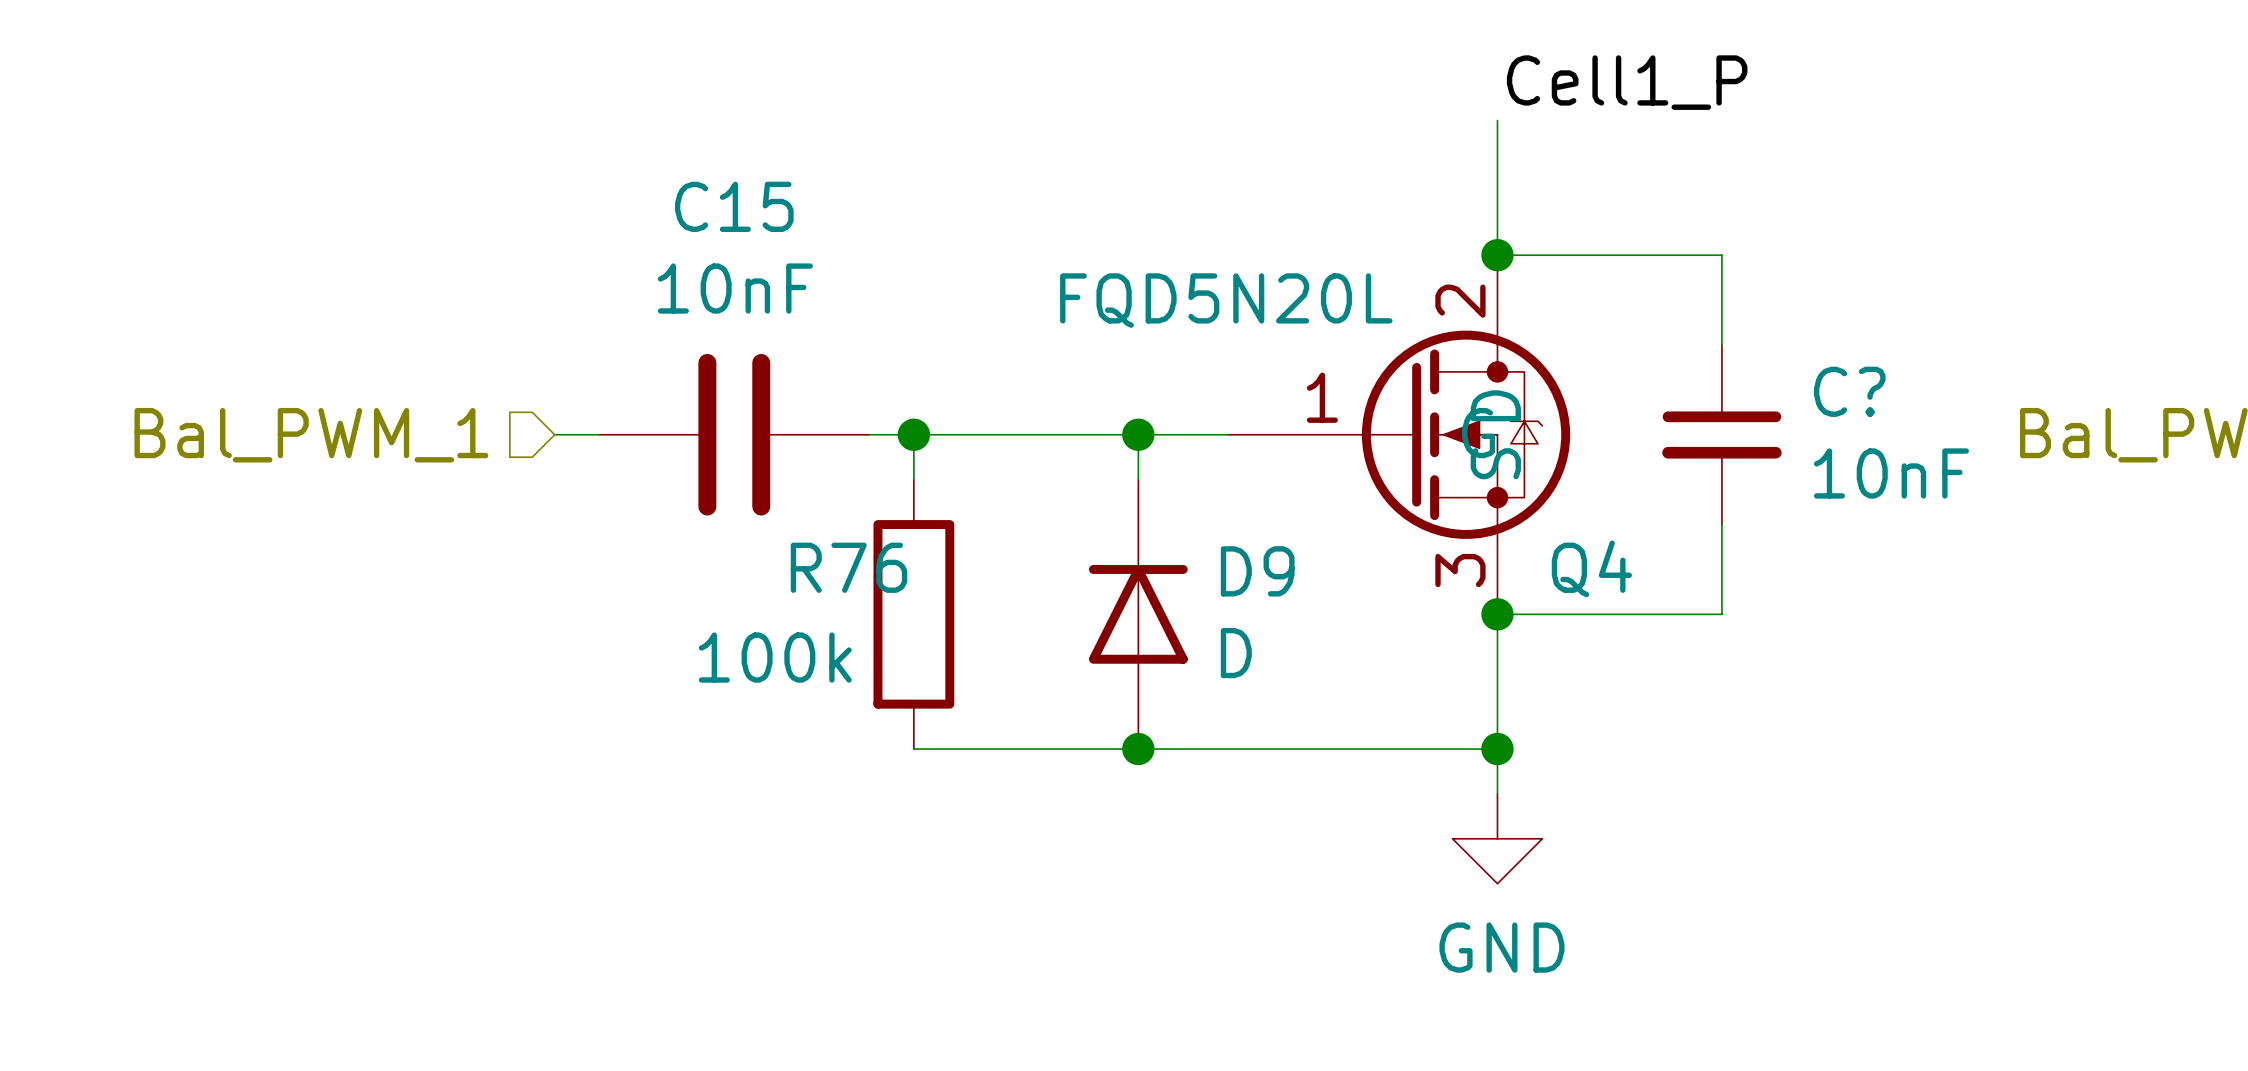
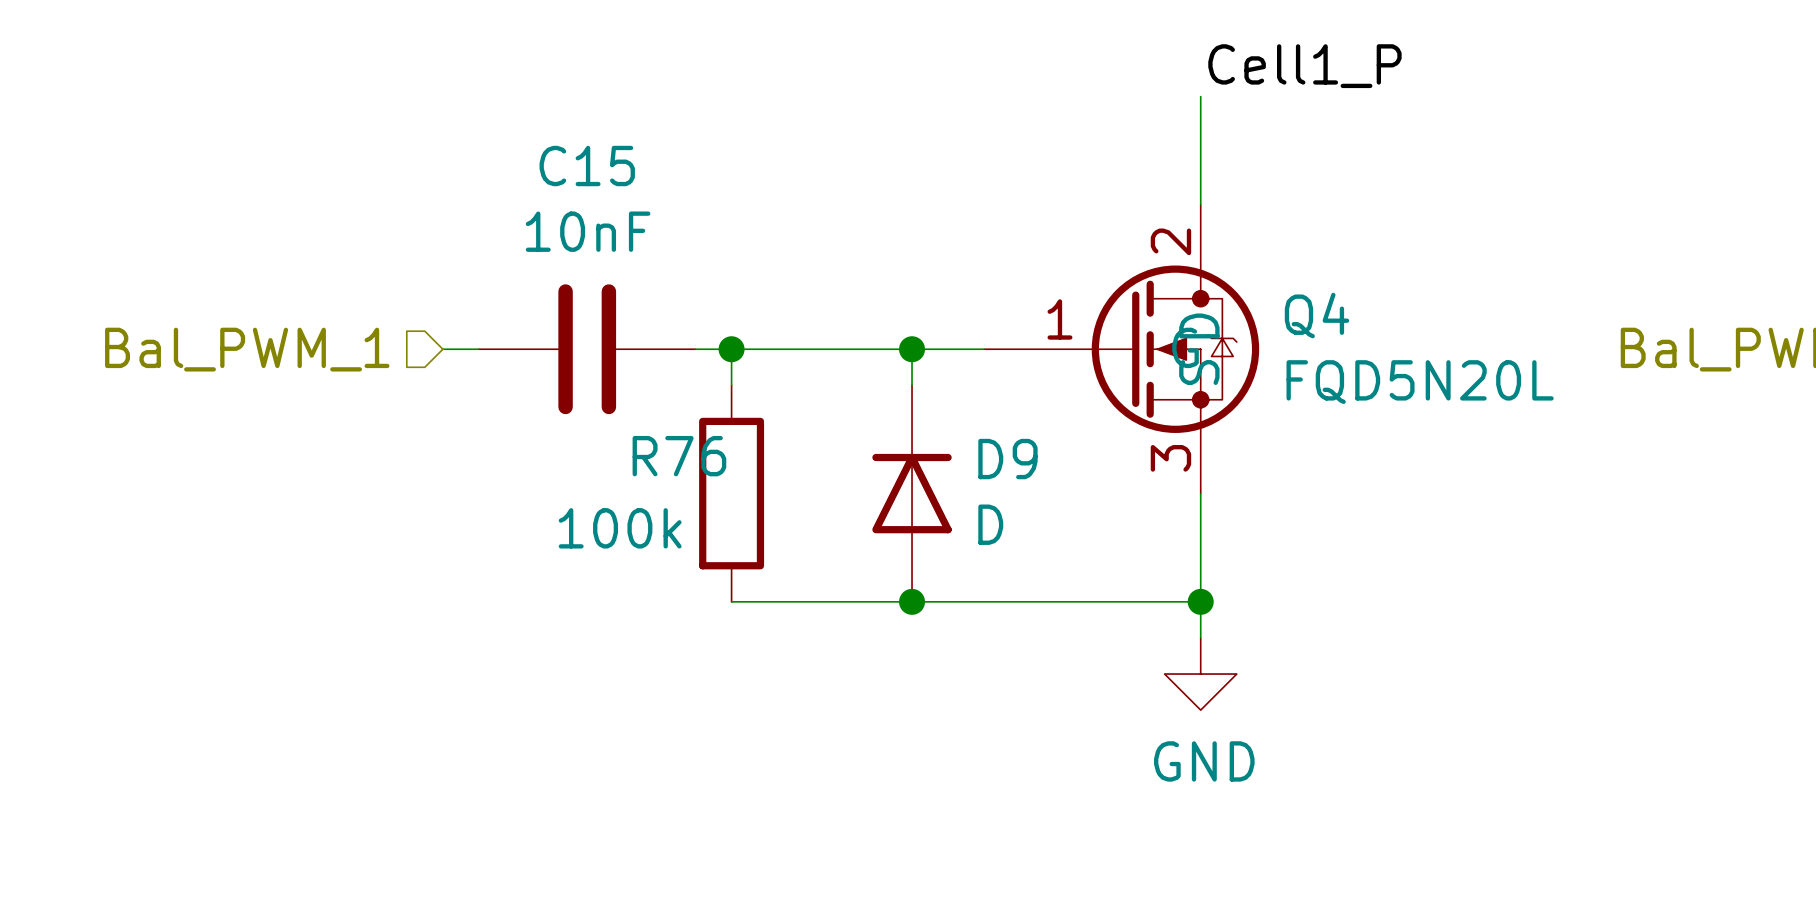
wire: (1497, 255) (1721, 255) (1721, 344) -> none
junction: (1497, 255) -> none
Q4 value position: FQD5N20L (1226, 300) -> FQD5N20L (1420, 382)
C?: 10nF (1721, 434) -> none
wire: (1721, 524) (1721, 614) (1497, 614) -> none
Q4 name position: Q4 (1591, 568) -> Q4 (1317, 315)
junction: (1497, 614) -> none

